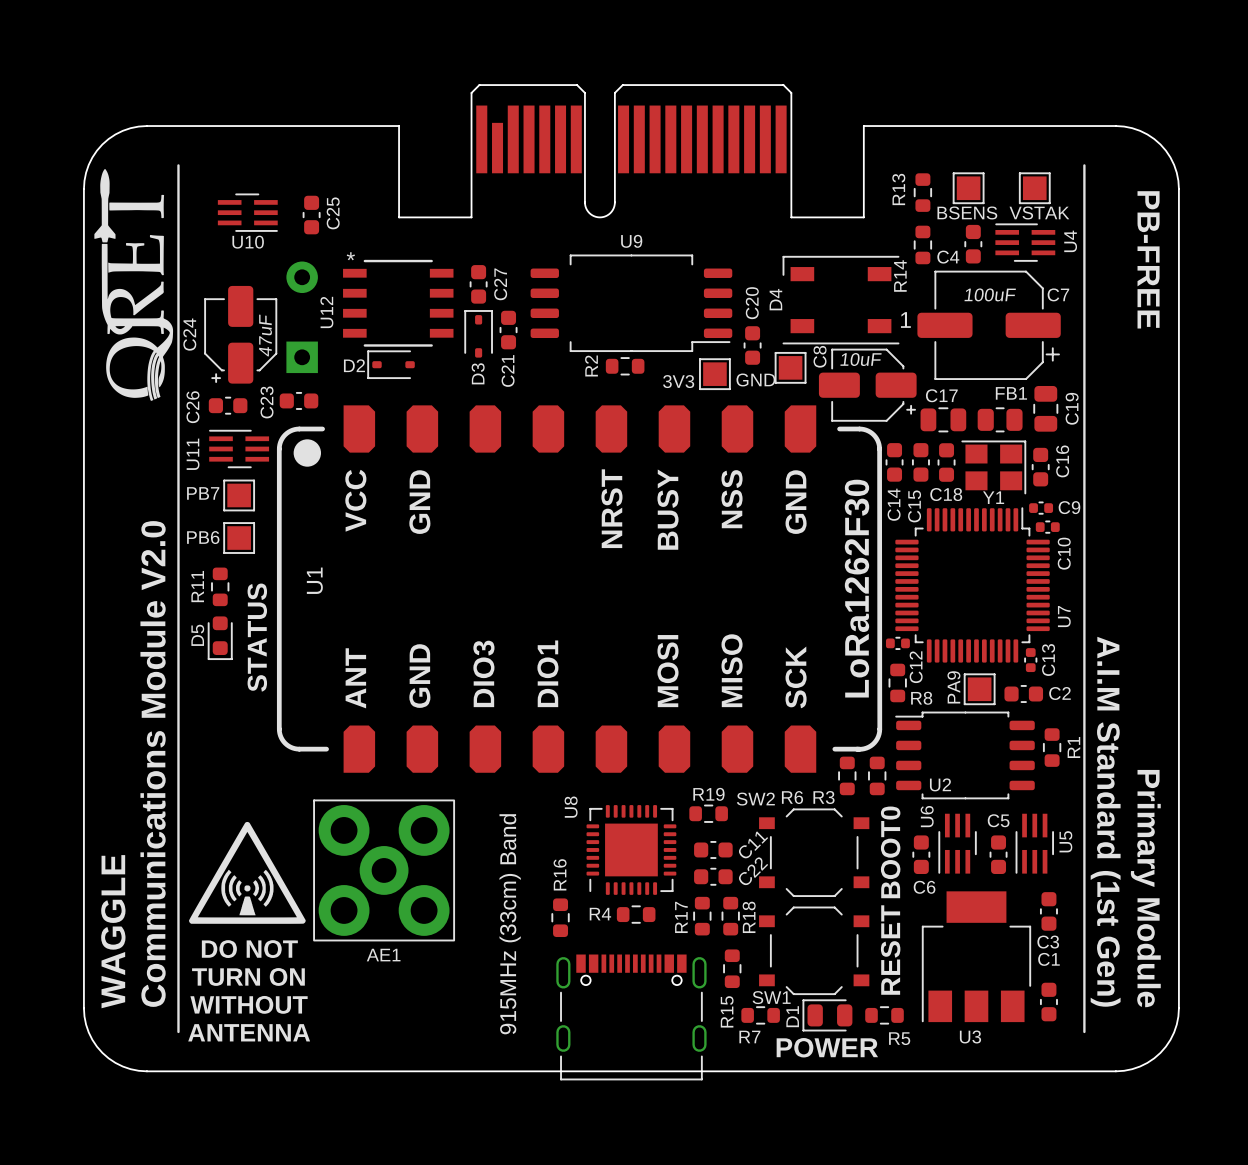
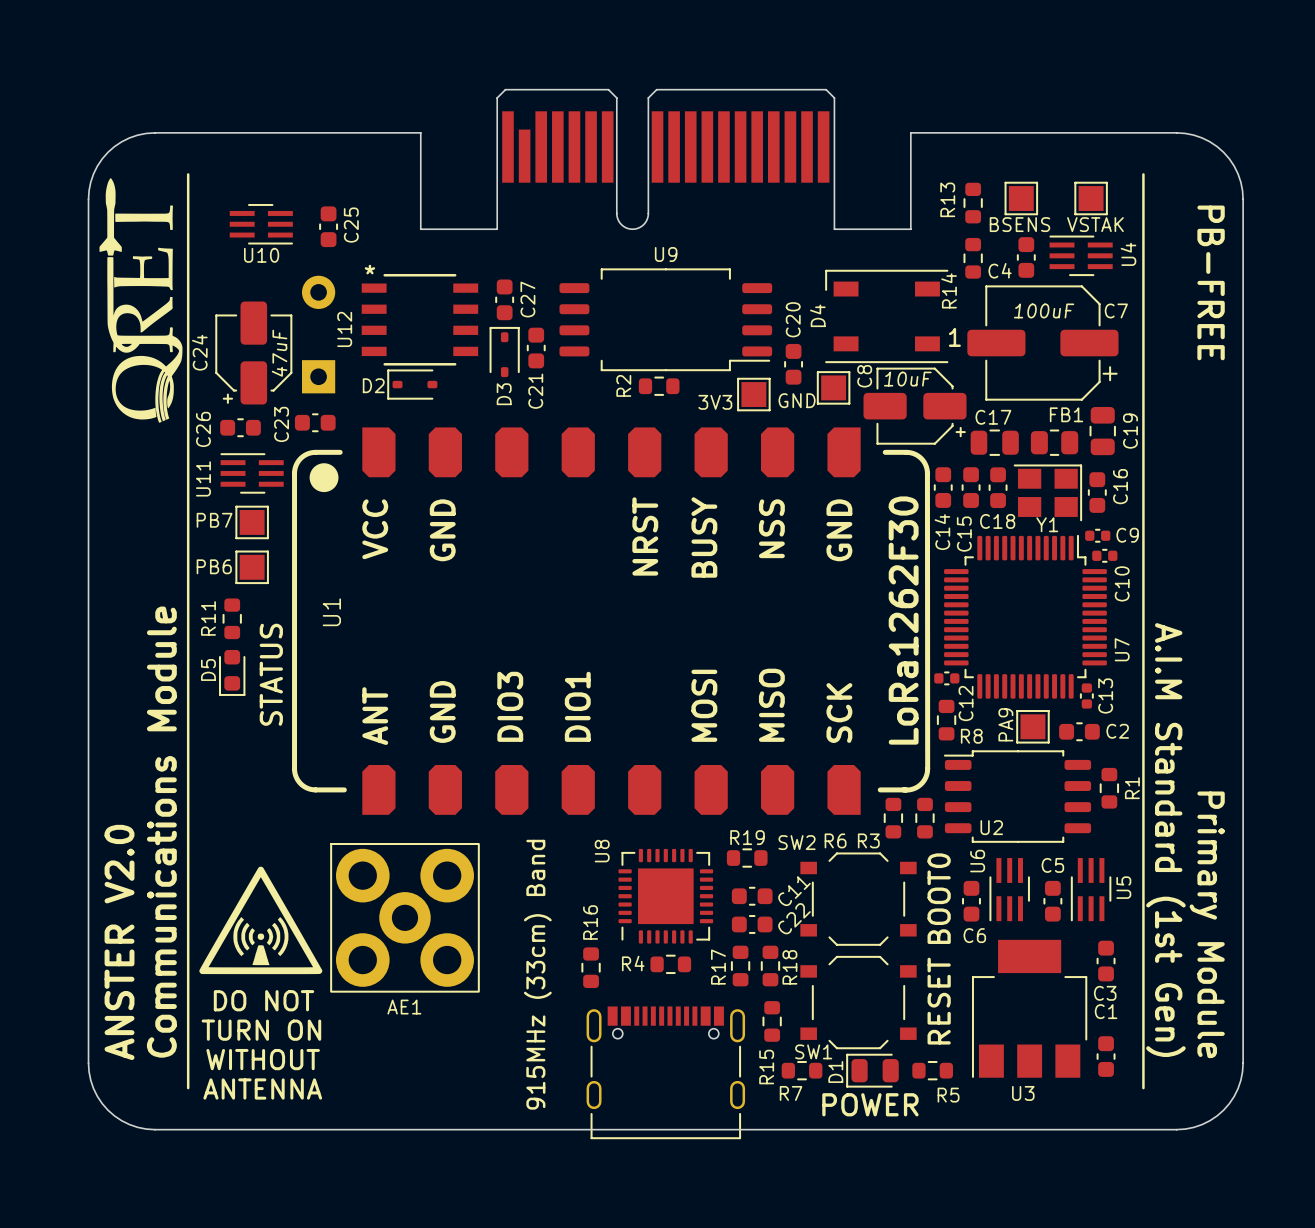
text: Communications Module V2.0 (153, 764) -> Communications Module (161, 832)
text: WAGGLE (113, 931) -> ANSTER V2.0 (119, 942)

